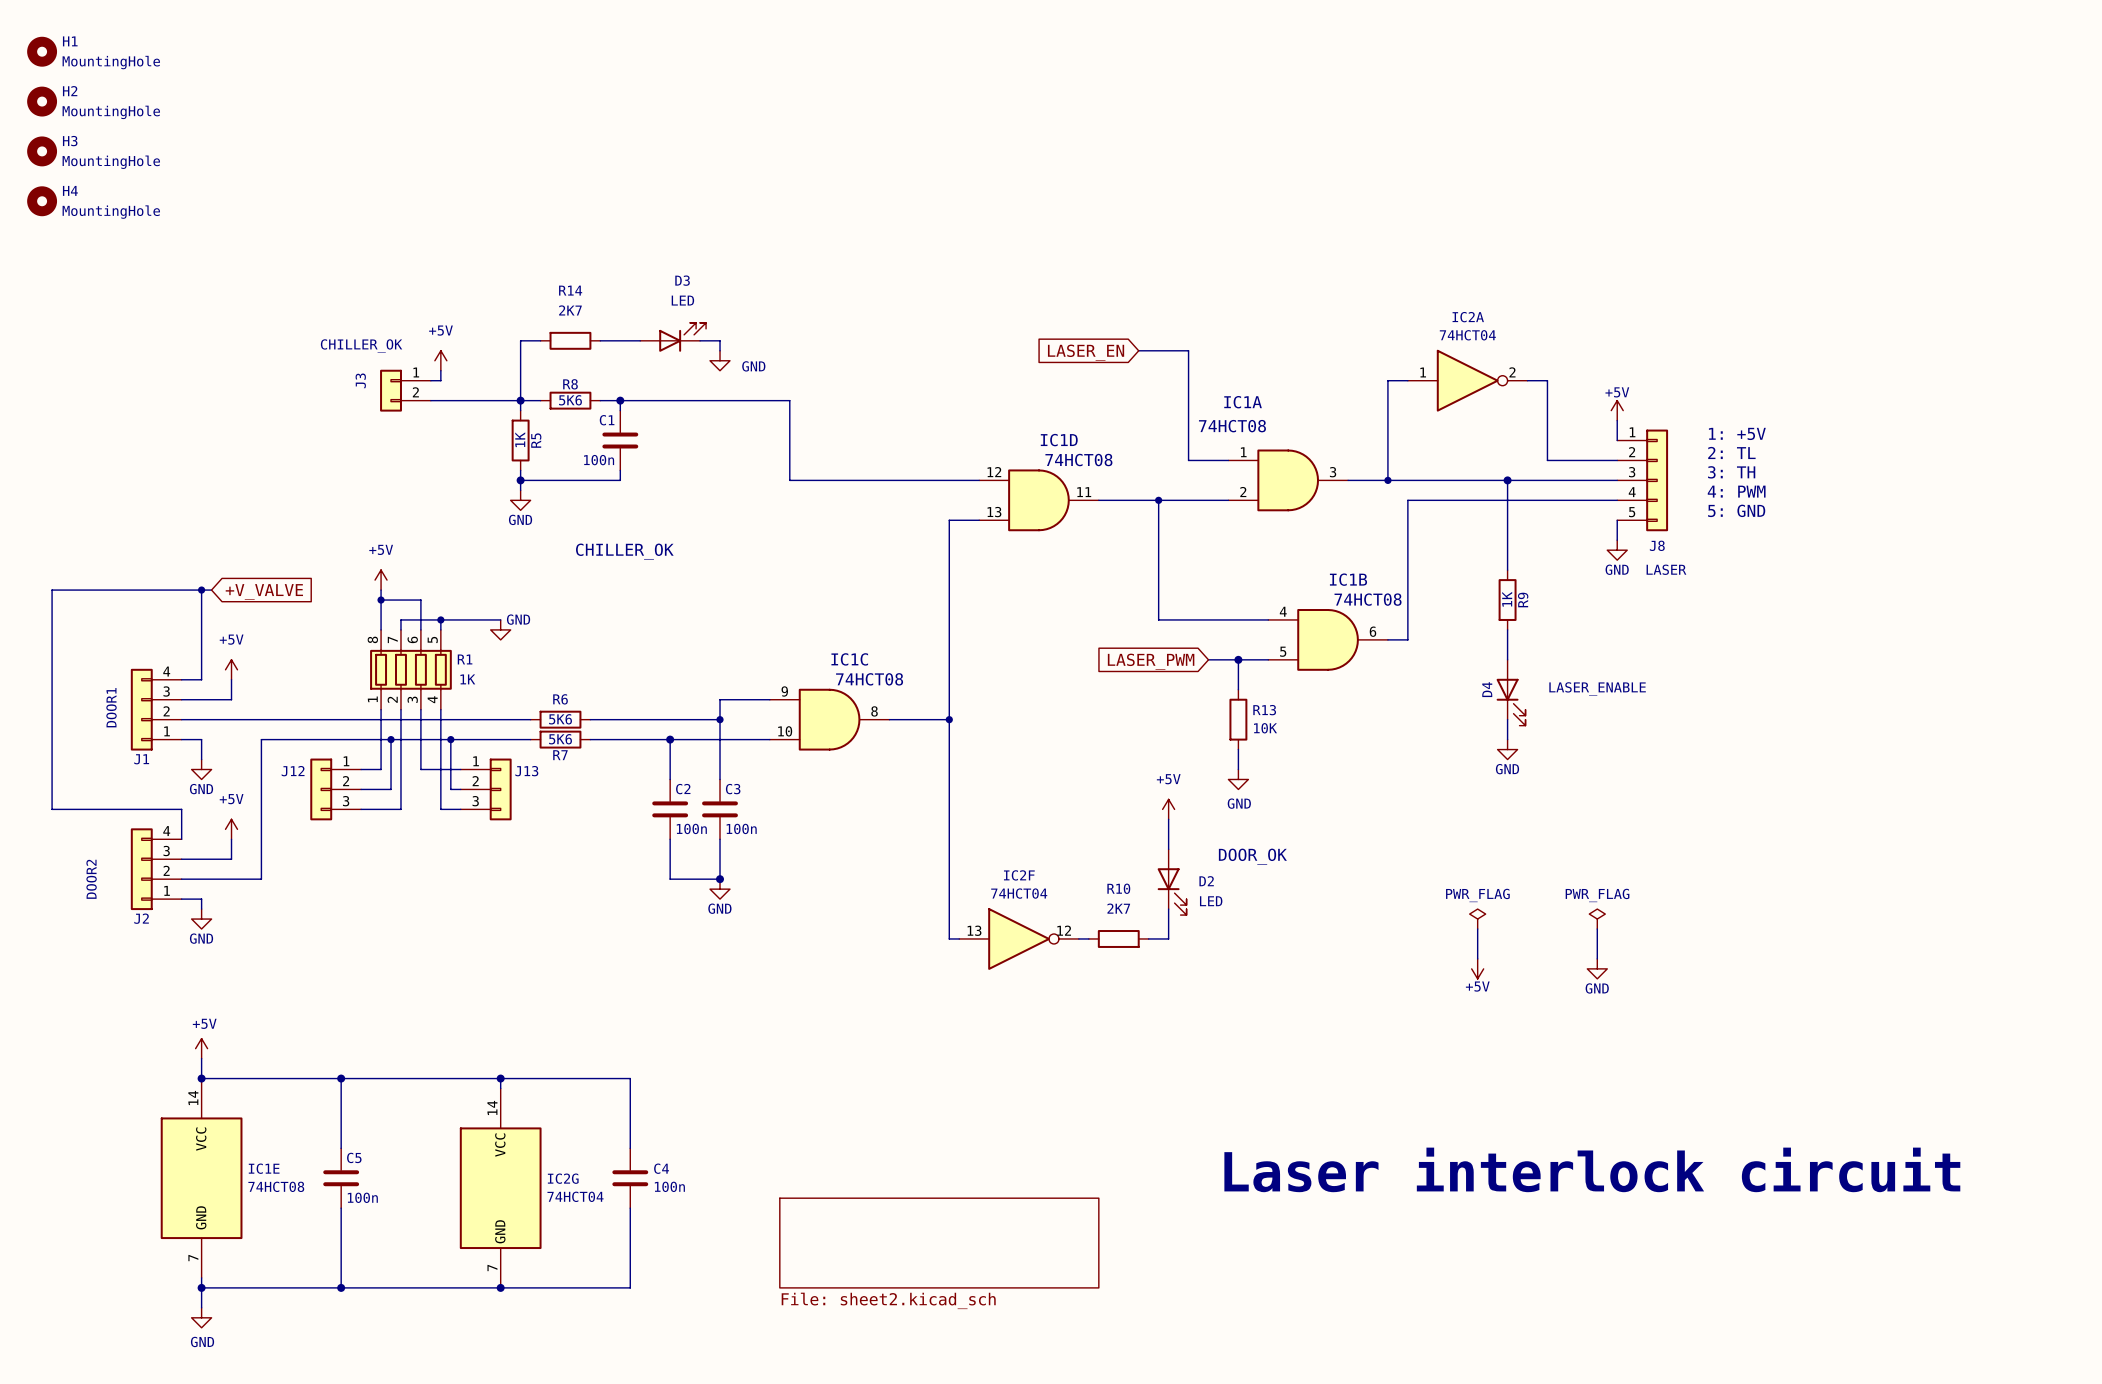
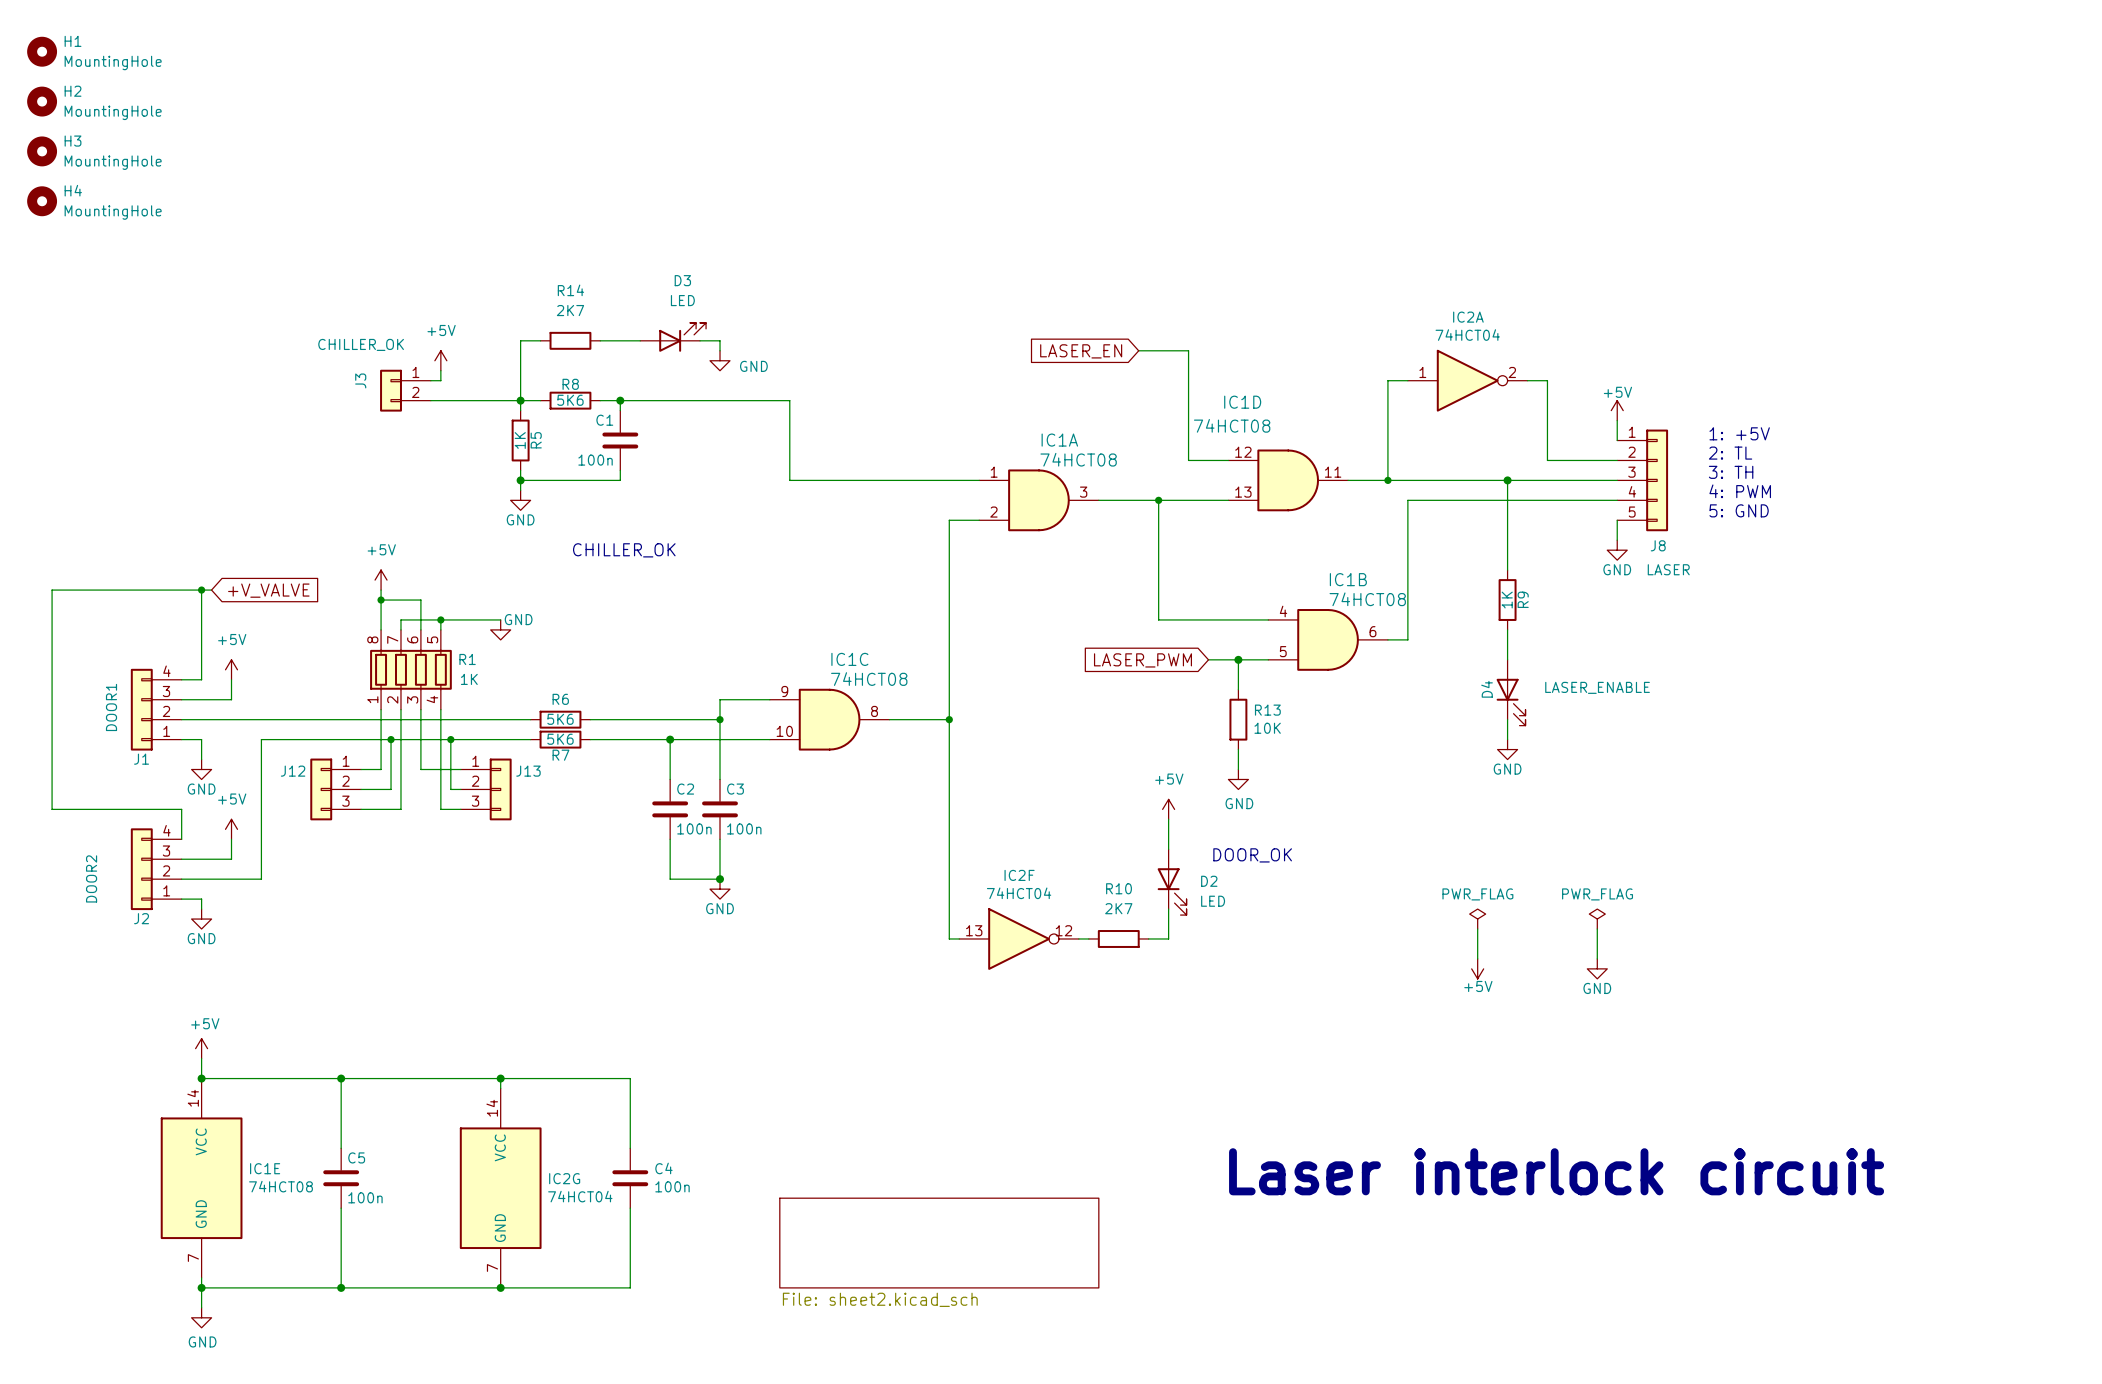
IC1A name position: IC1A (1243, 402) -> IC1A (1059, 440)
IC1D name position: IC1D (1059, 440) -> IC1D (1242, 402)
IC1A position: (1288, 480) -> (1039, 500)
IC1D position: (1039, 500) -> (1288, 480)

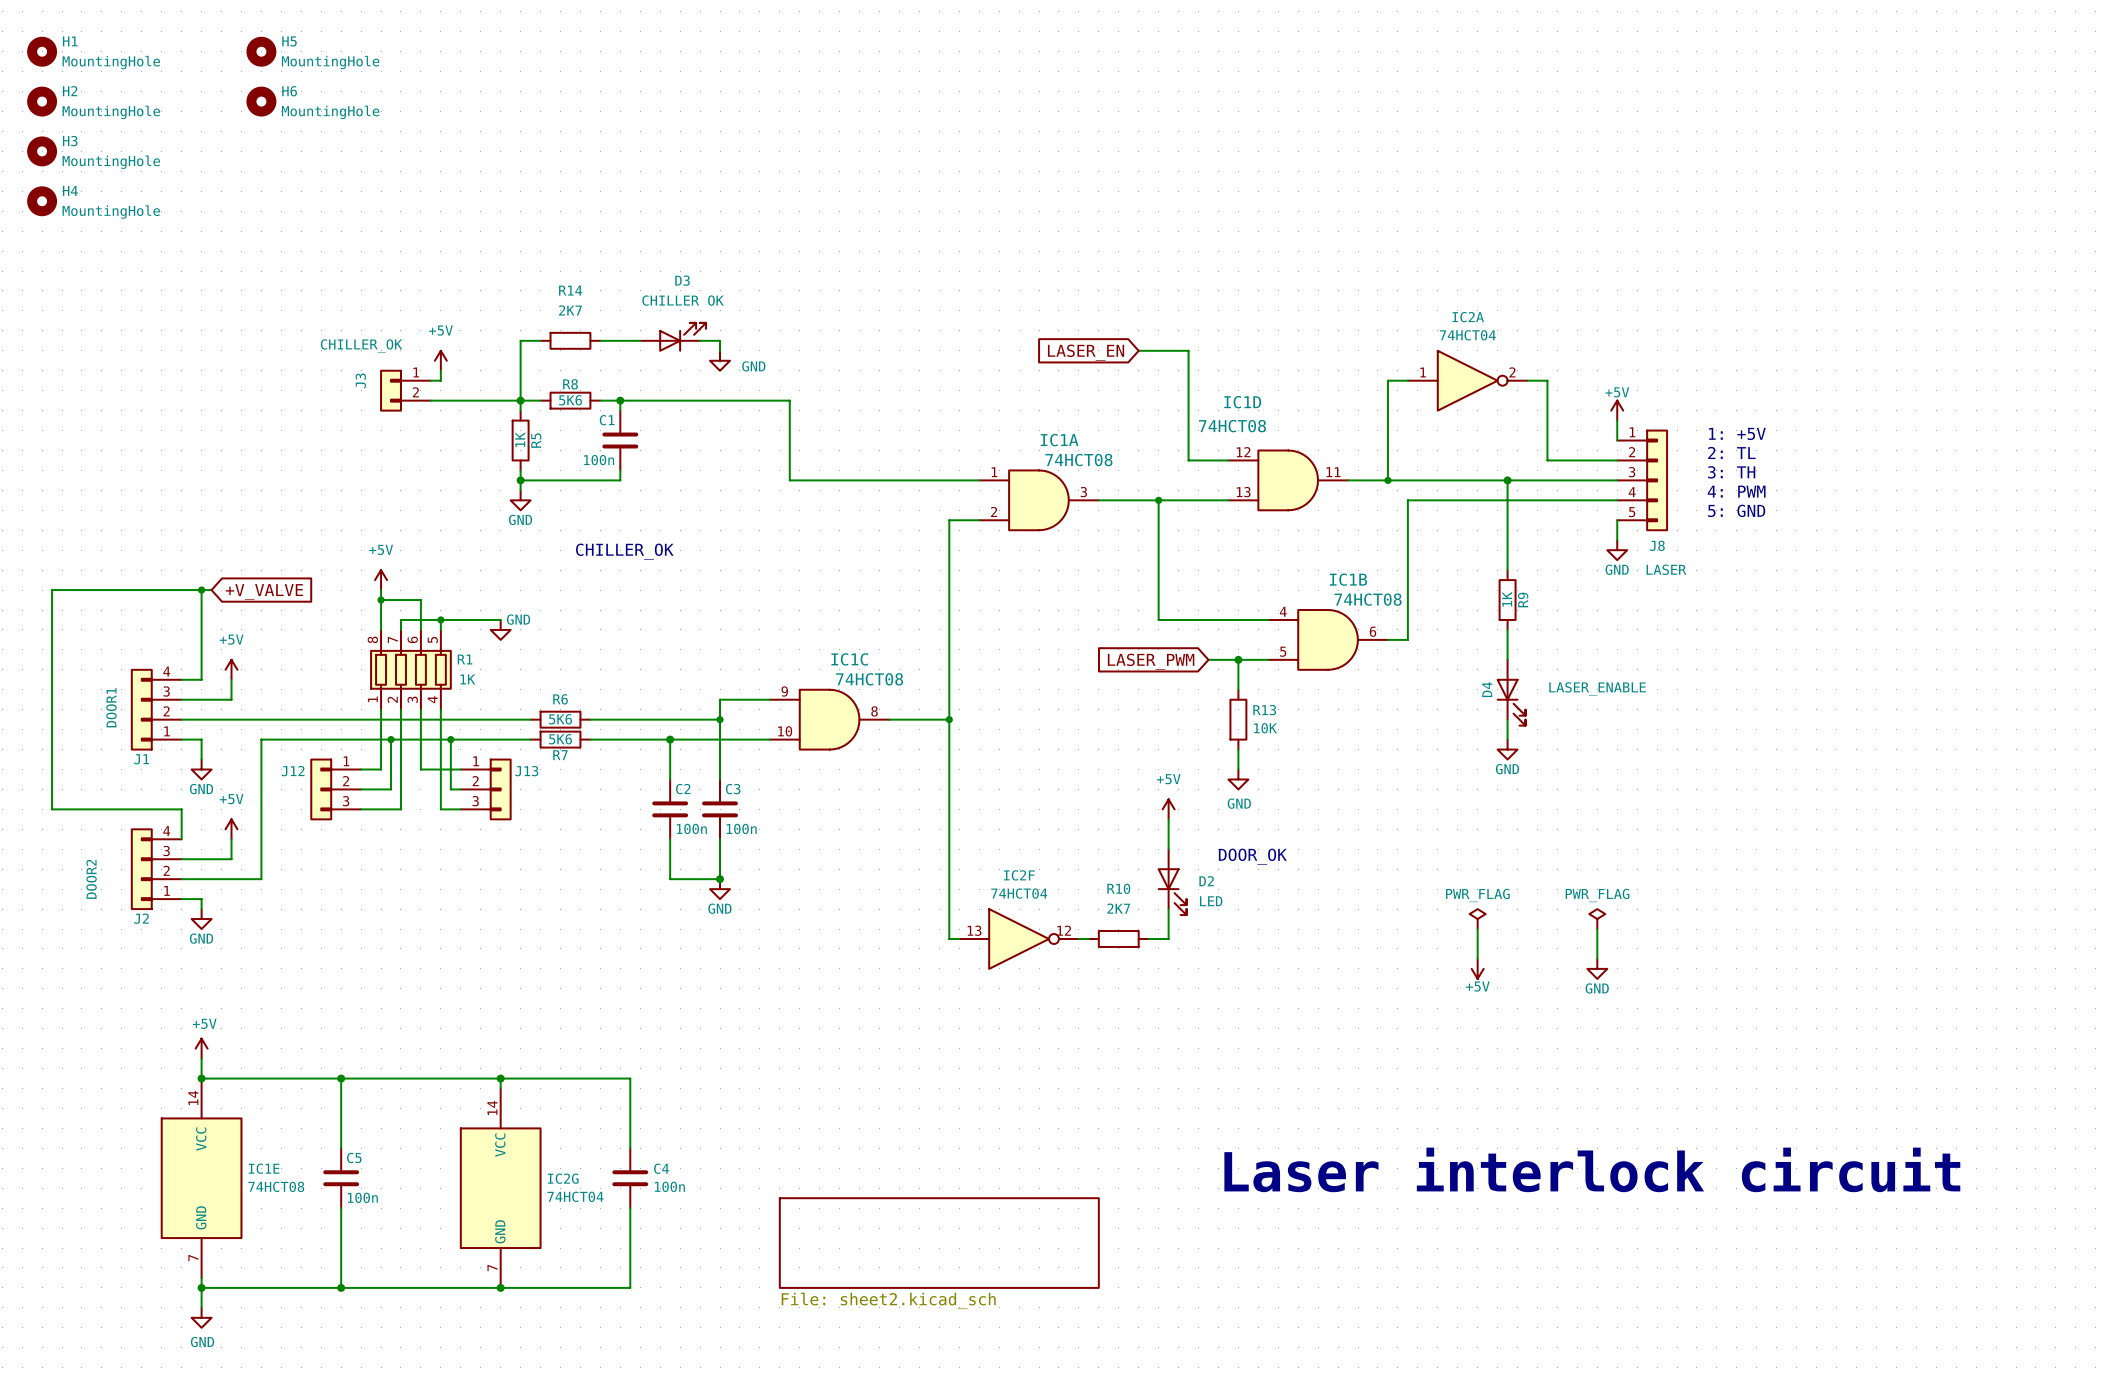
H5: none -> MountingHole (261, 51)
H6: none -> MountingHole (261, 101)
D3 value: LED (682, 300) -> CHILLER OK (683, 300)

